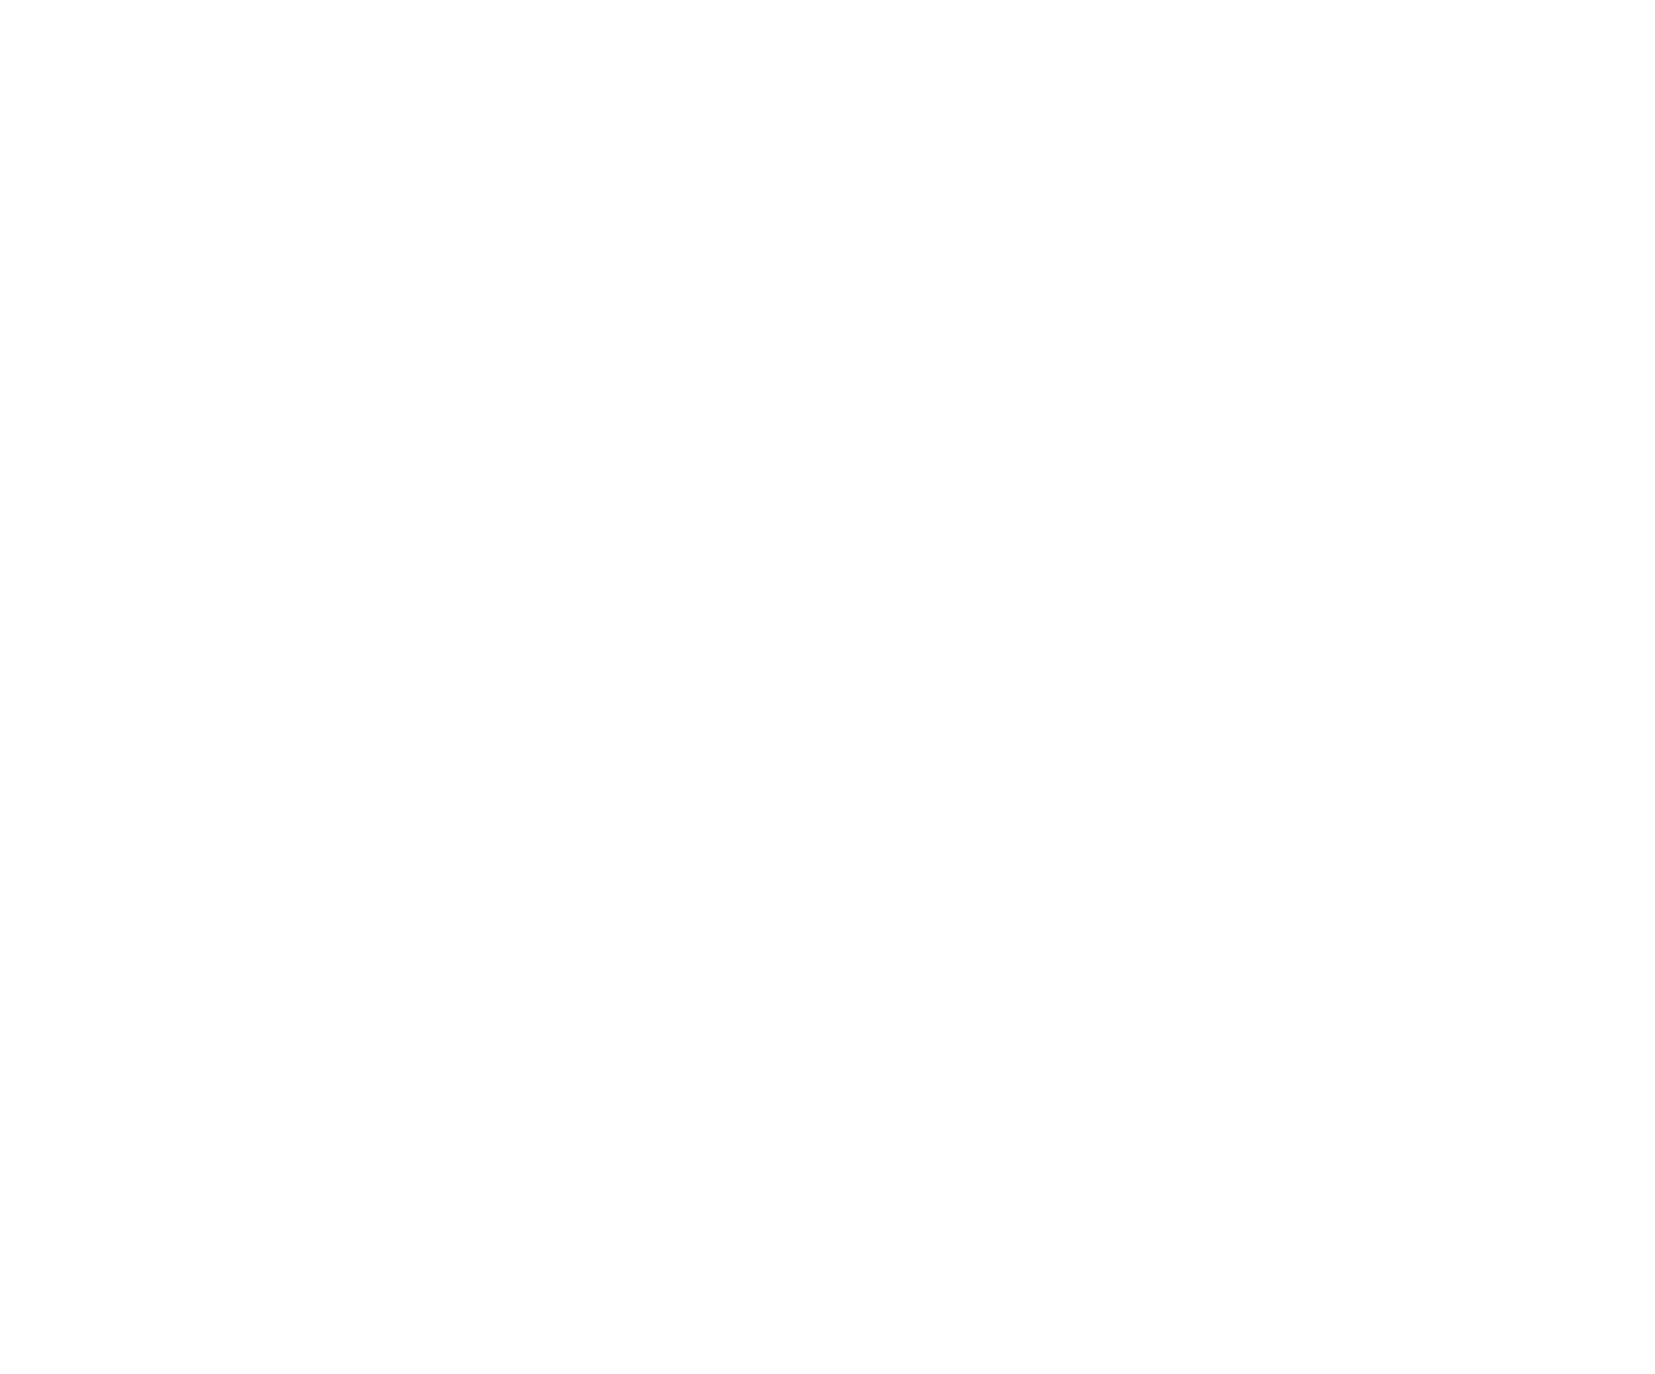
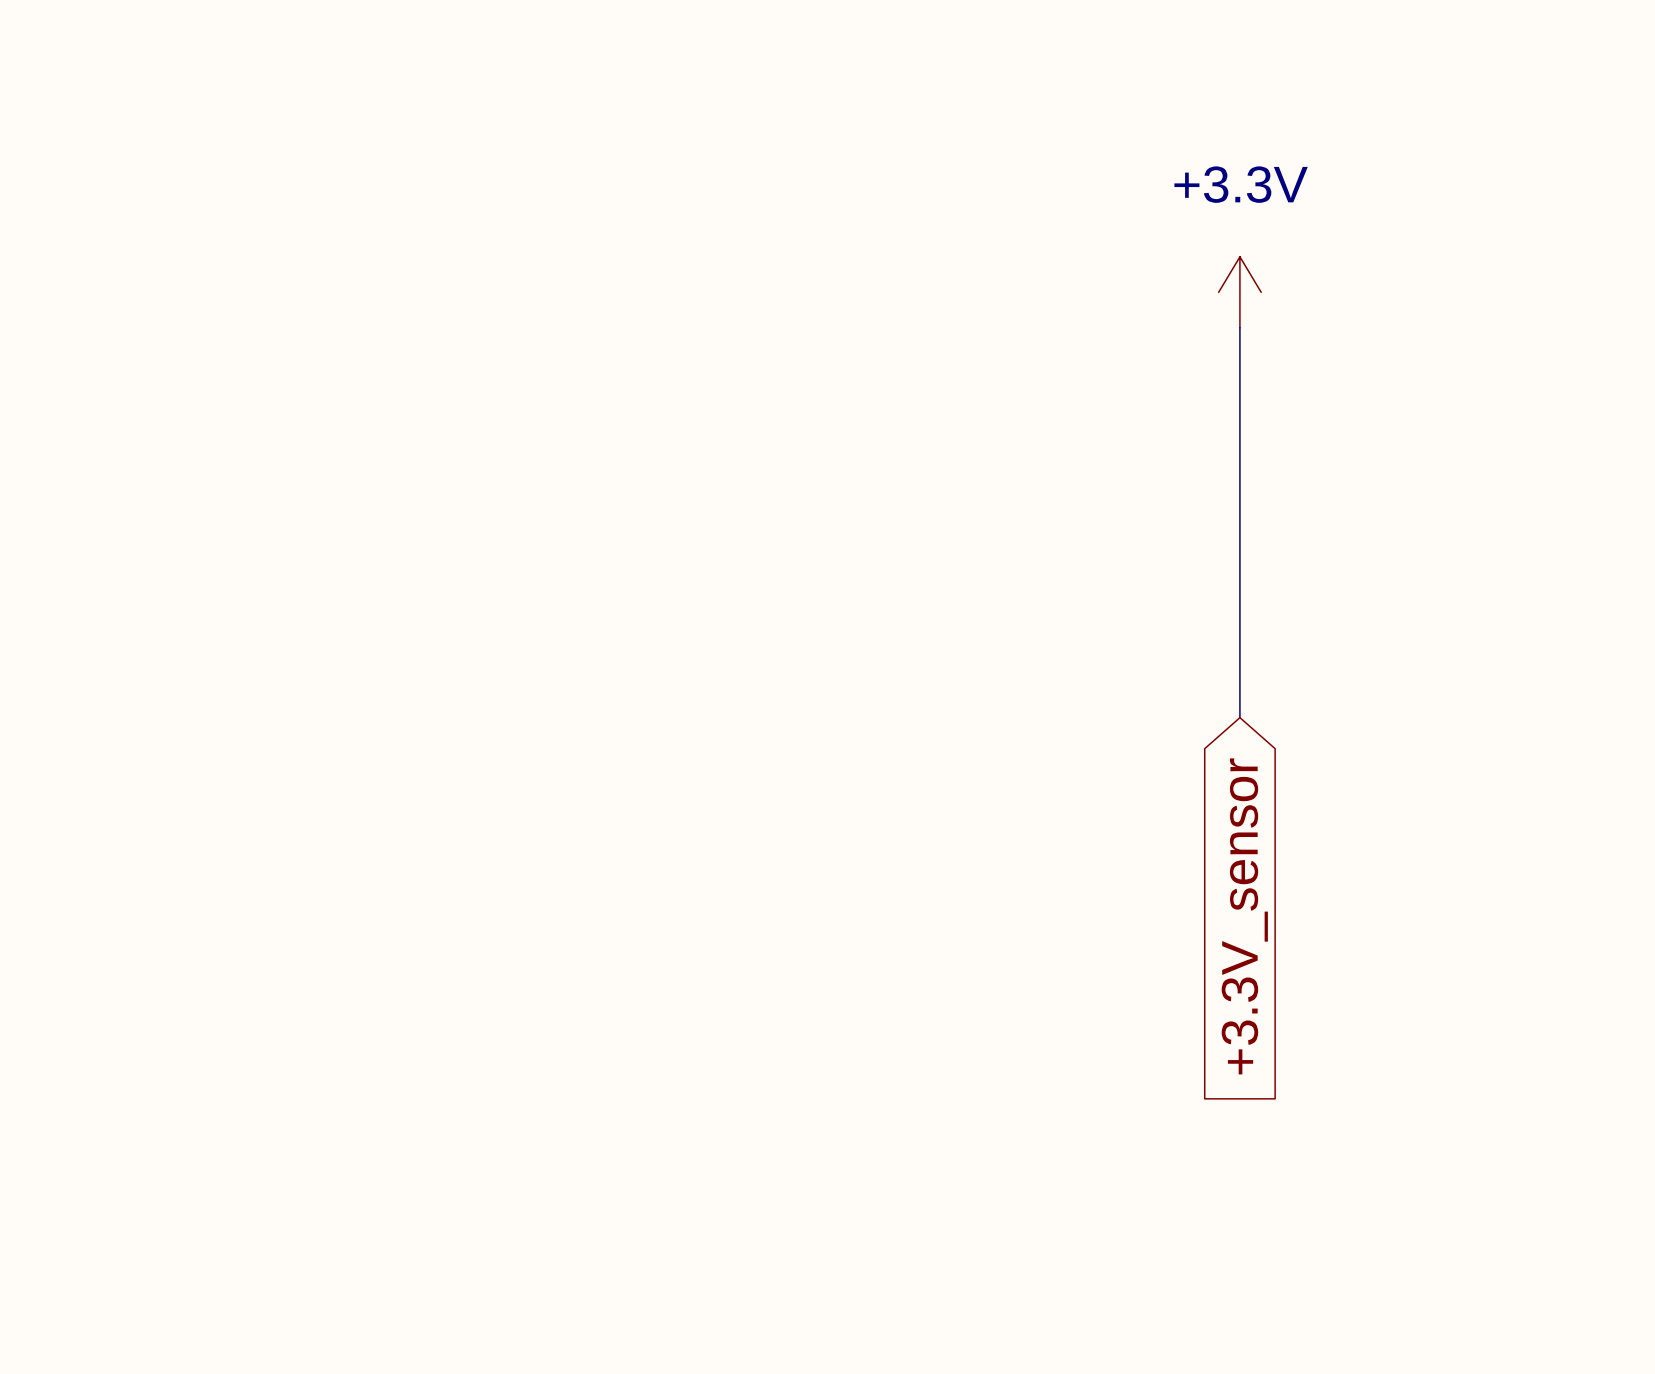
power symbol: none -> +3.3V (1239, 292)
wire: none -> (1239, 327) (1239, 717)
global label: none -> +3.3V_sensor (1244, 916)

